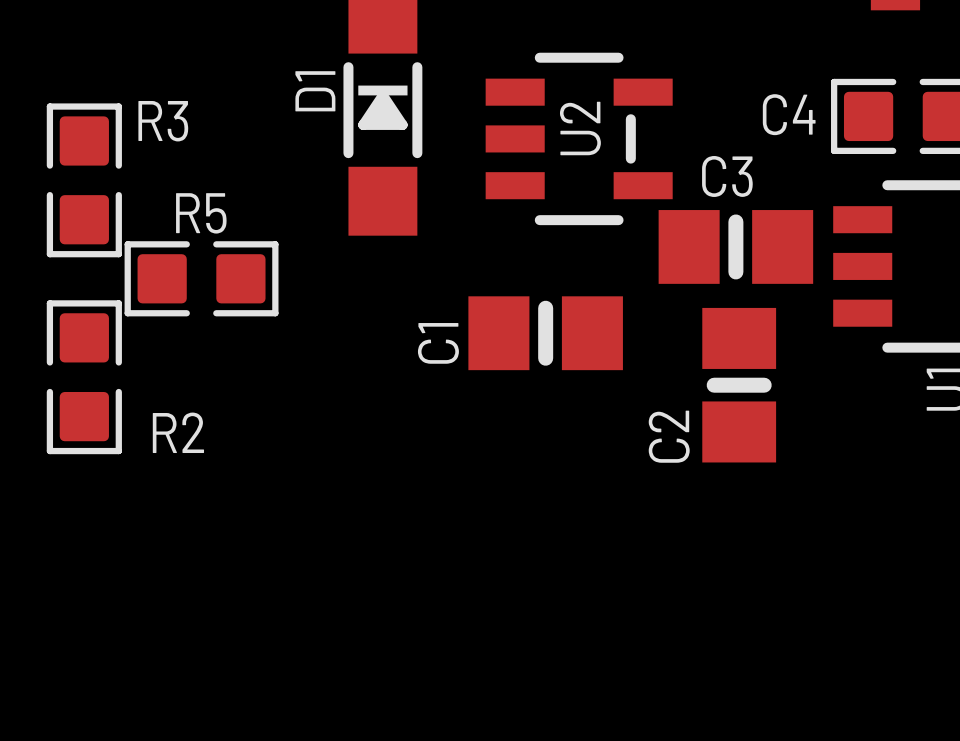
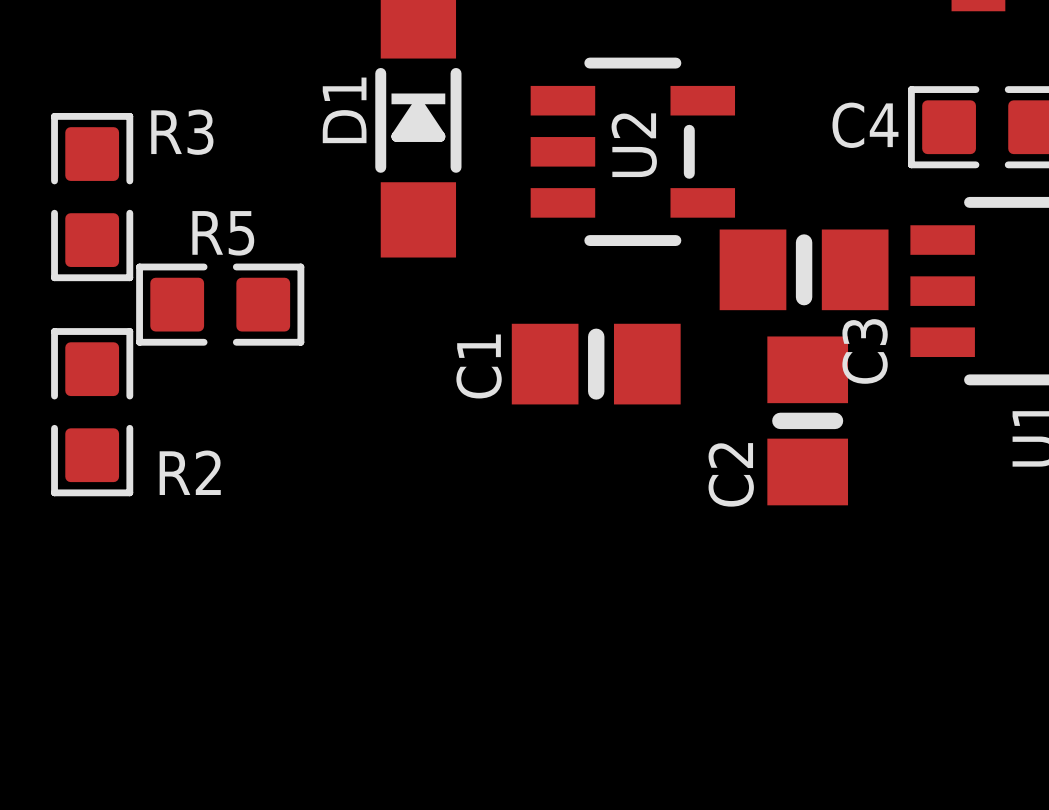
C3 name rotation: 0° (727, 176) -> 90° counterclockwise (865, 351)
C3 name position: C3 (727, 176) -> C3 (865, 351)

